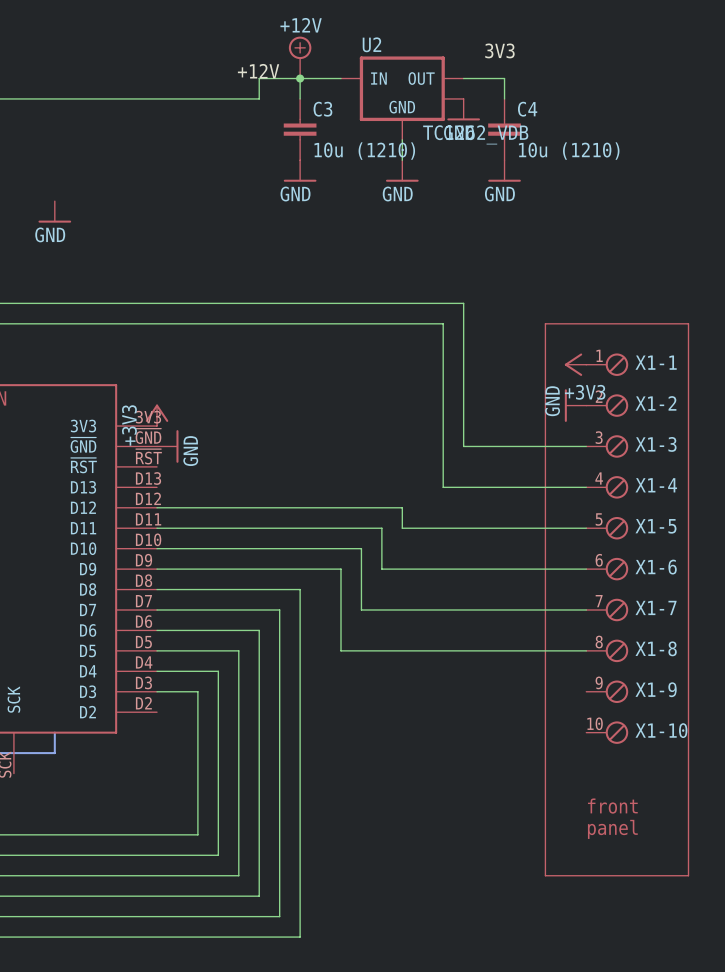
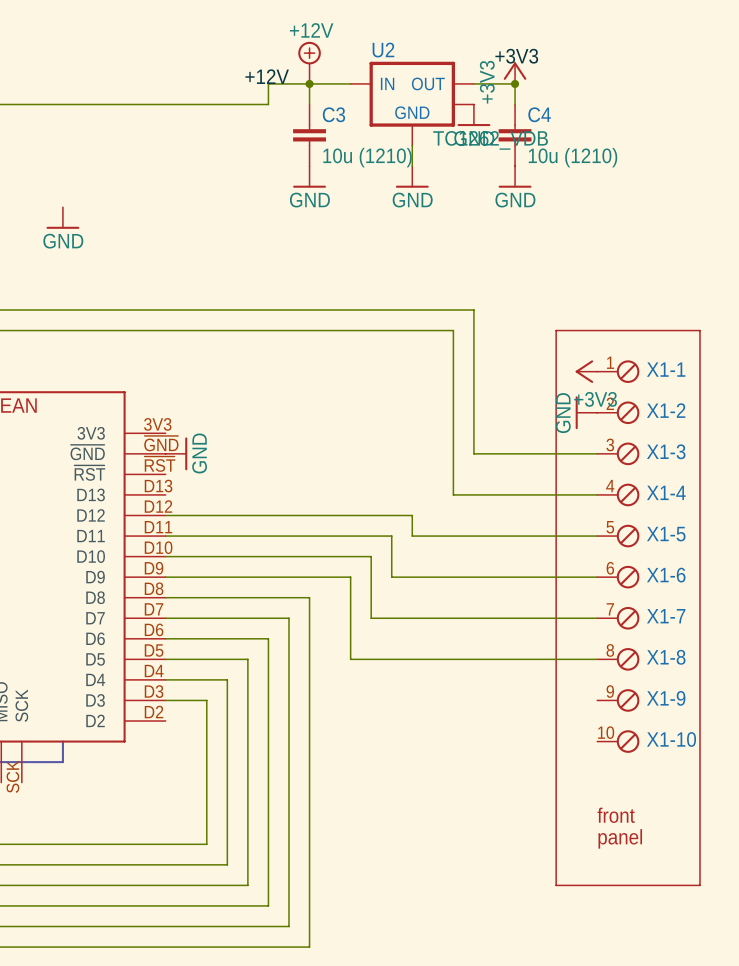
label: 3V3 (499, 50) -> +3V3 (516, 56)
power symbol: none -> +3V3 (515, 73)
junction: none -> (515, 83)
power symbol: +3V3 (157, 415) -> none

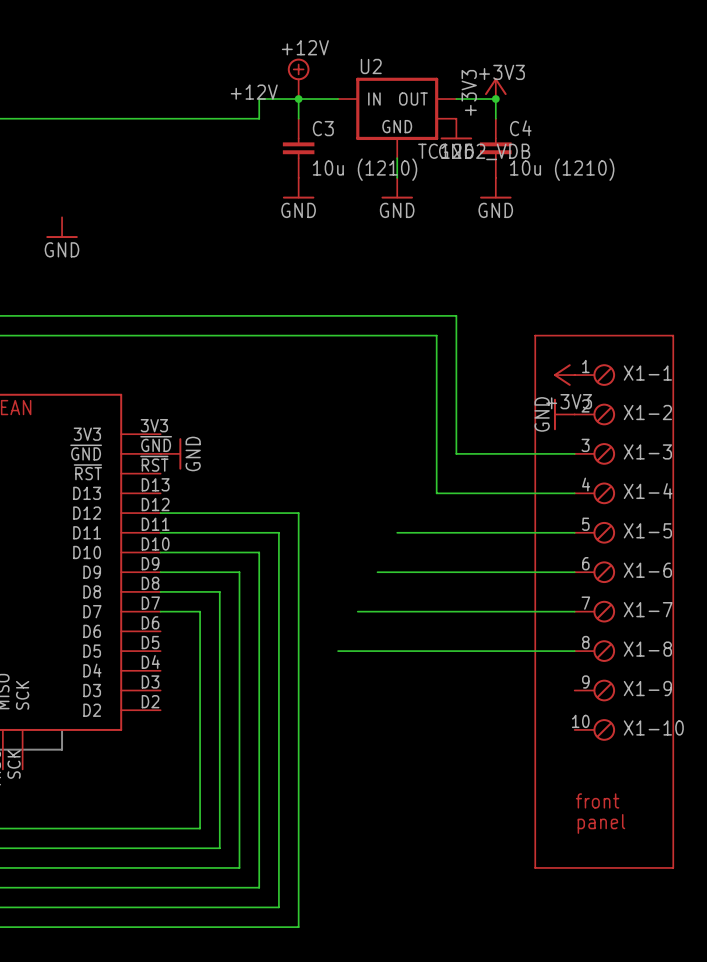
wire: (309, 515) (412, 515) (412, 536) -> none
wire: (288, 536) (391, 536) (391, 577) -> (278, 532) (278, 611)
wire: (268, 556) (371, 556) (371, 618) -> (259, 552) (259, 631)
wire: (247, 577) (350, 577) (350, 659) -> (239, 572) (239, 651)
wire: (227, 597) (309, 597) -> (298, 513) (298, 591)
wire: (206, 618) (288, 618) -> none
wire: (165, 638) (268, 638) -> none
wire: (165, 659) (247, 659) -> none
wire: (165, 679) (227, 679) -> (219, 591) (219, 670)
wire: (165, 700) (206, 700) -> (200, 611) (200, 690)

